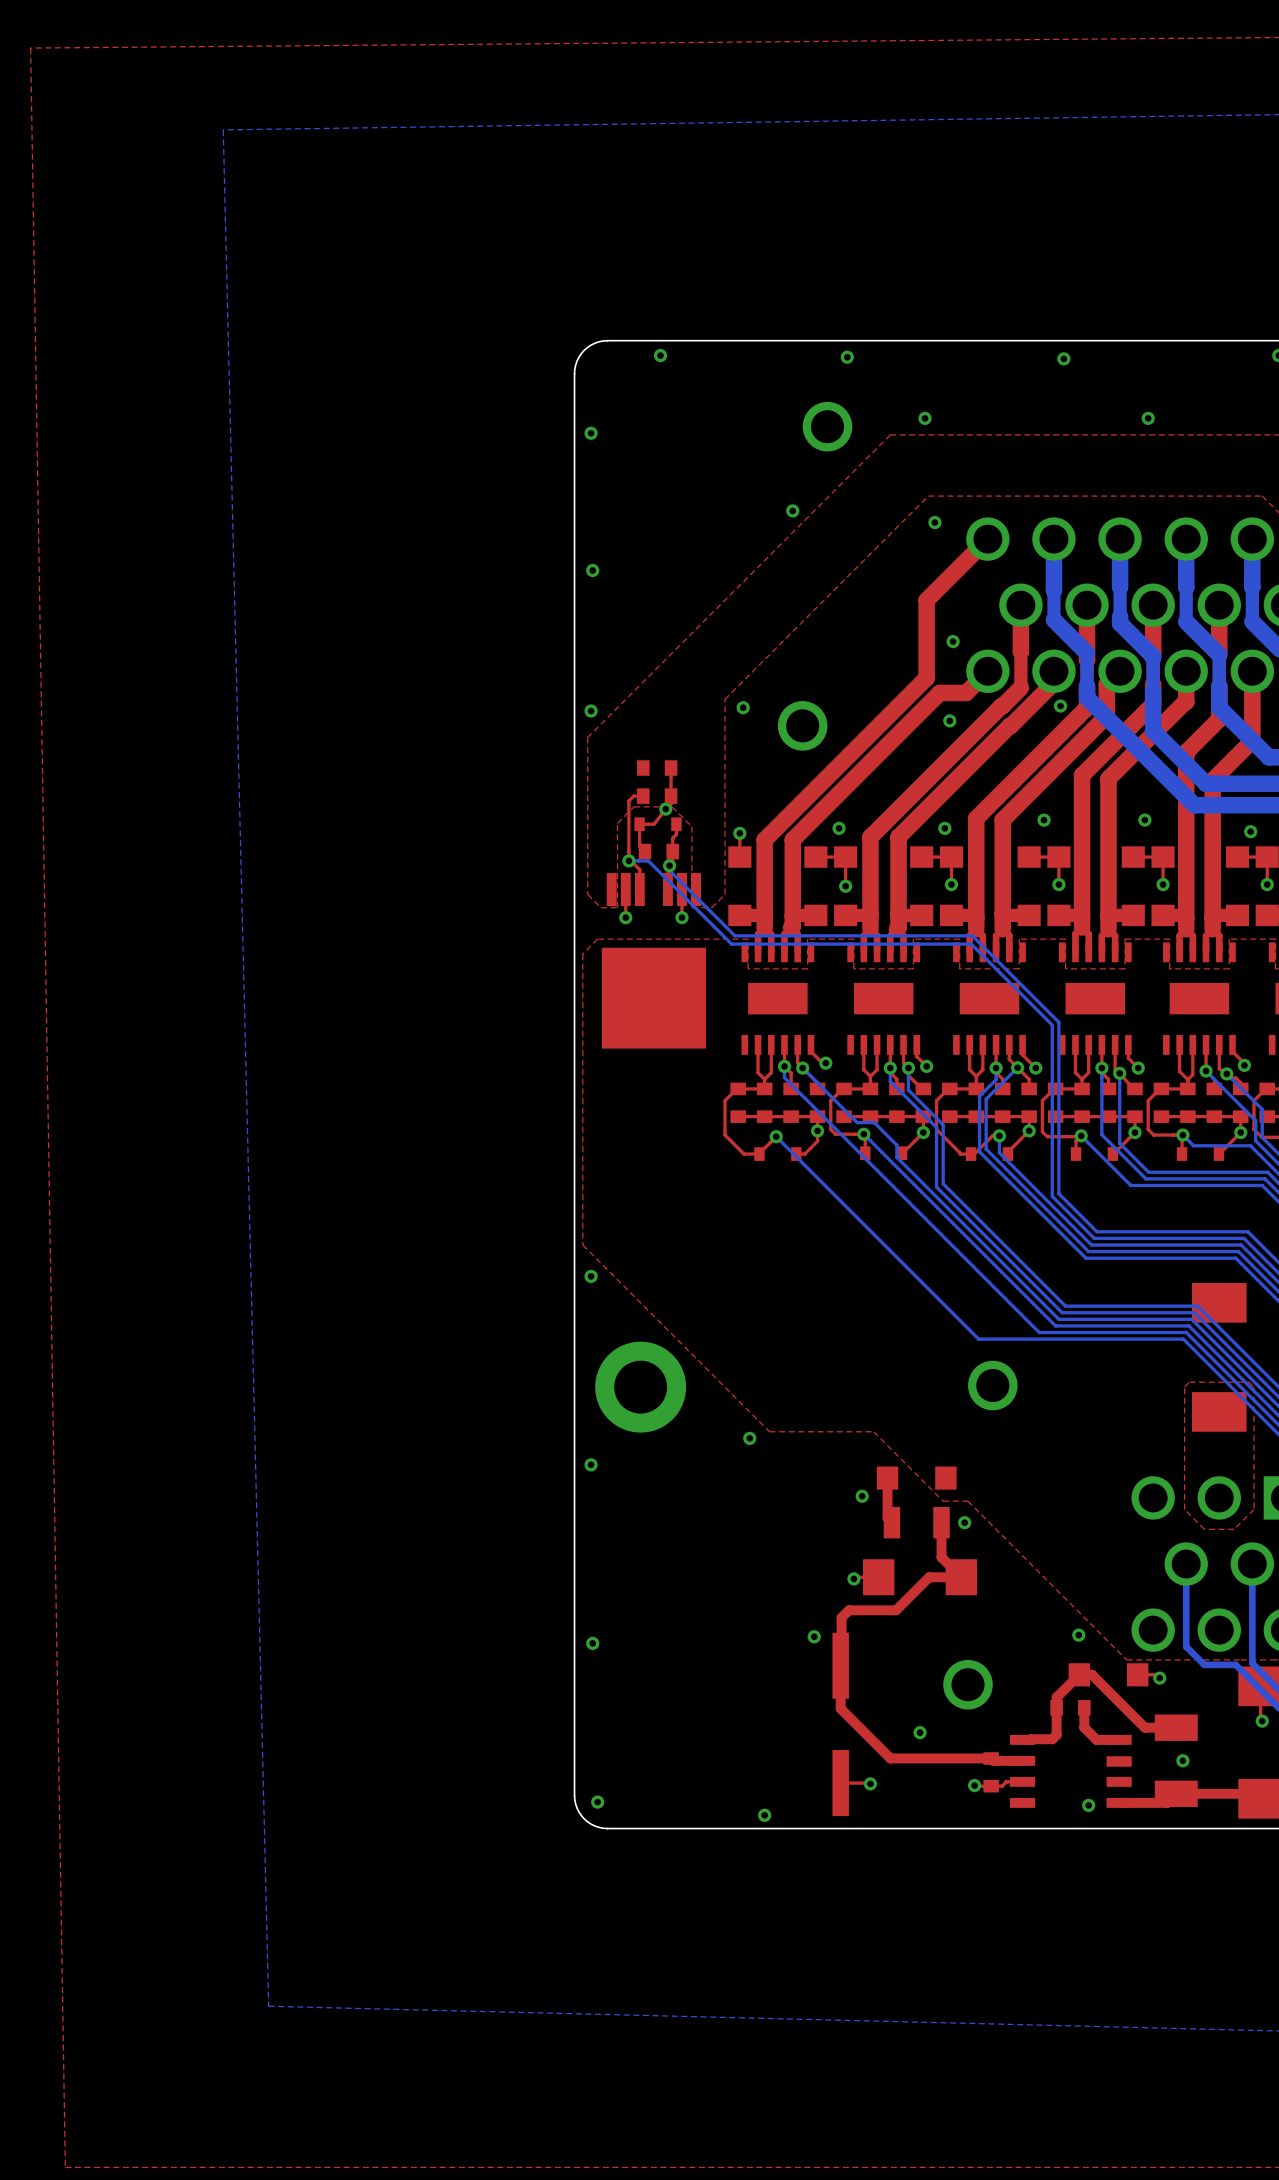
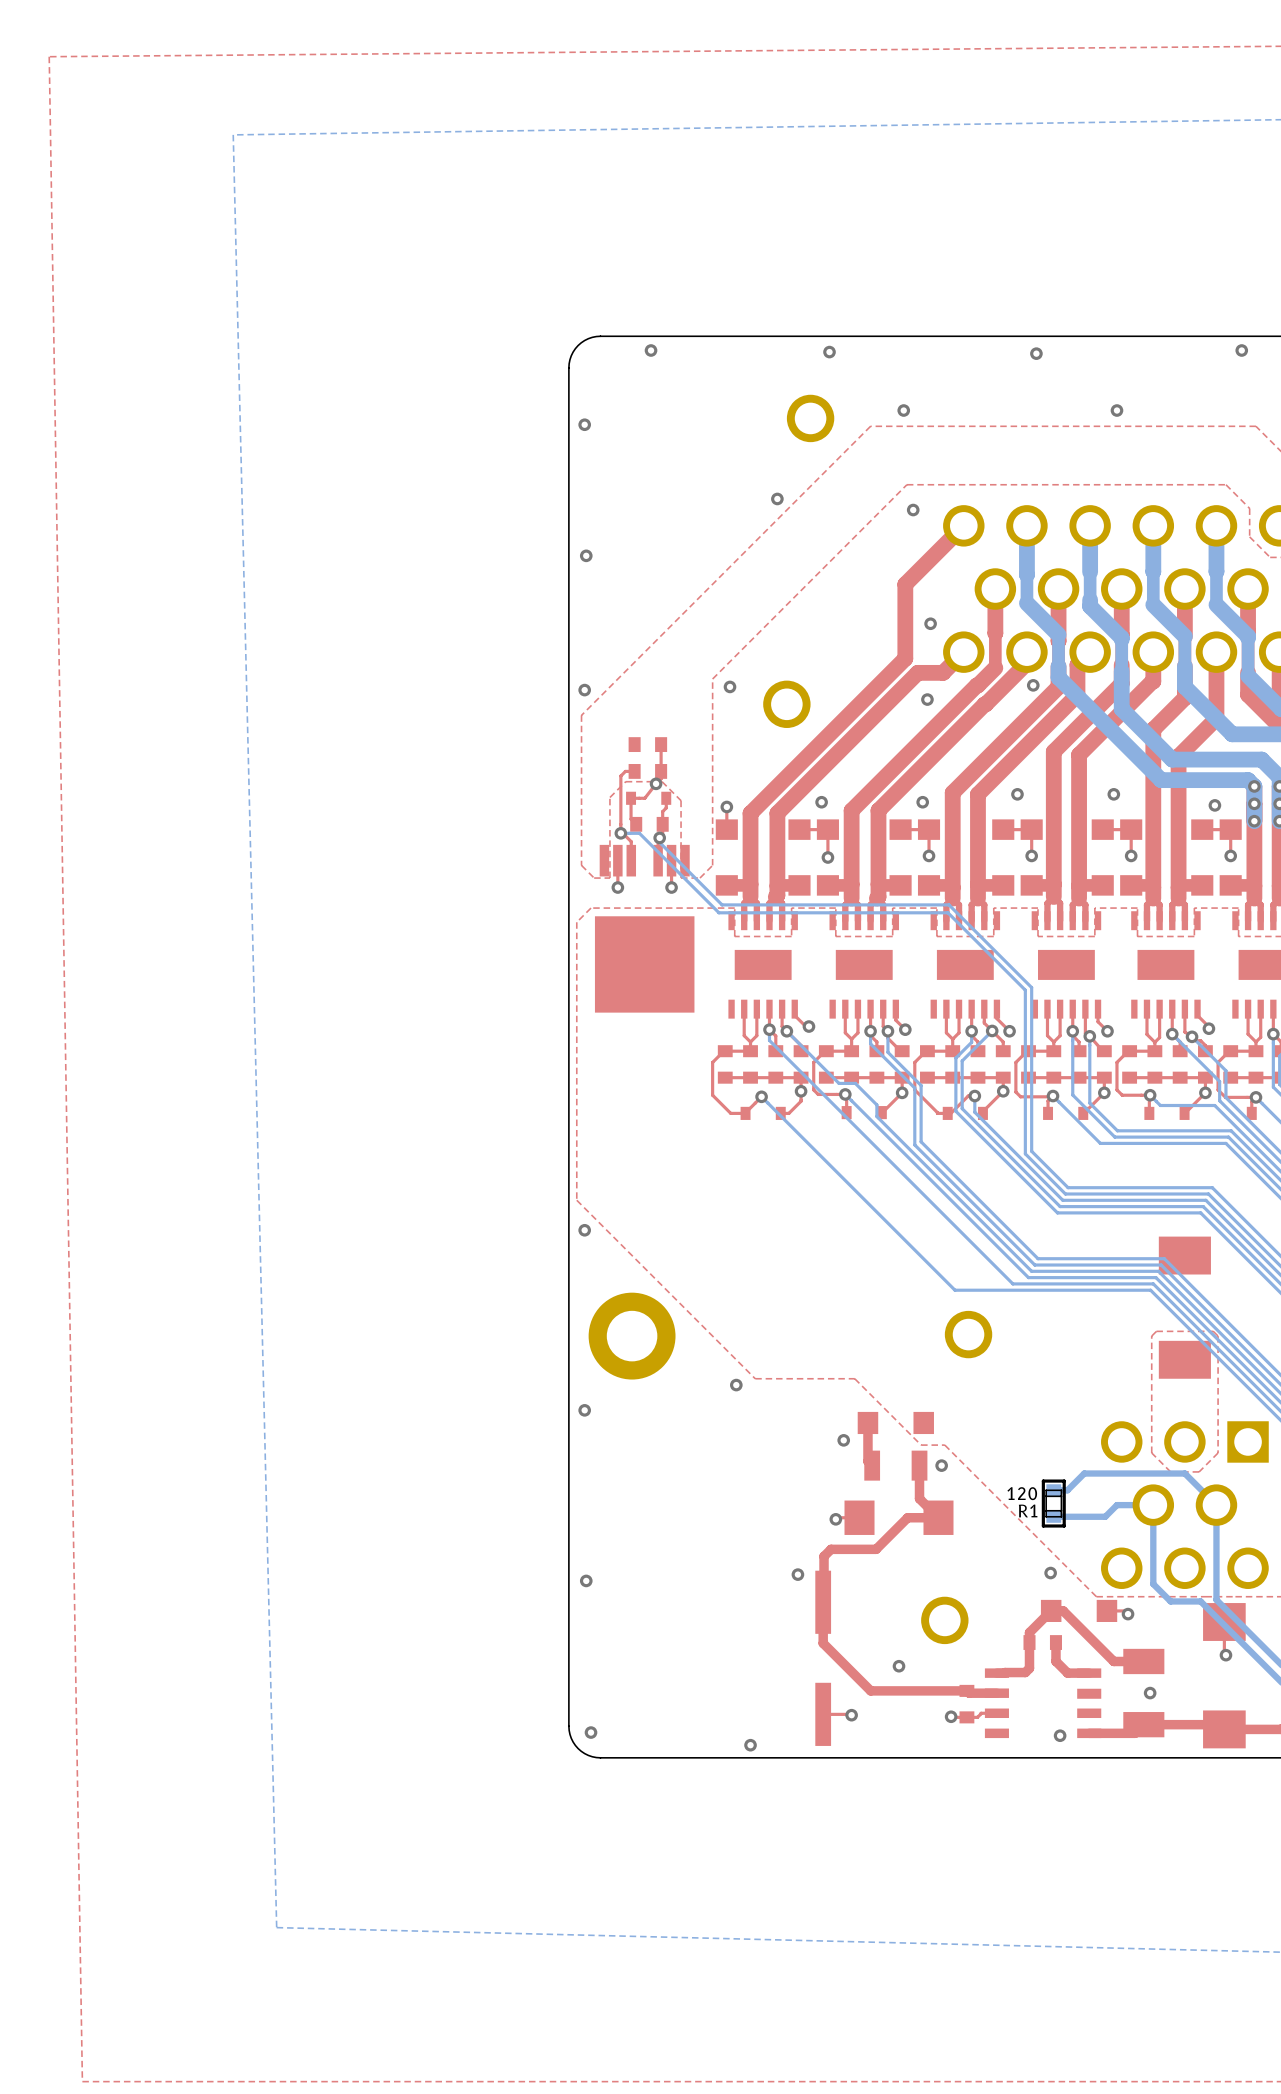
bottom track: none -> (1053, 1490) (1067, 1490) (1084, 1473) (1184, 1473) (1216, 1505)
R1: none -> 120 (1053, 1503)
bottom track: none -> (1153, 1505) (1116, 1505) (1105, 1516) (1053, 1516)

